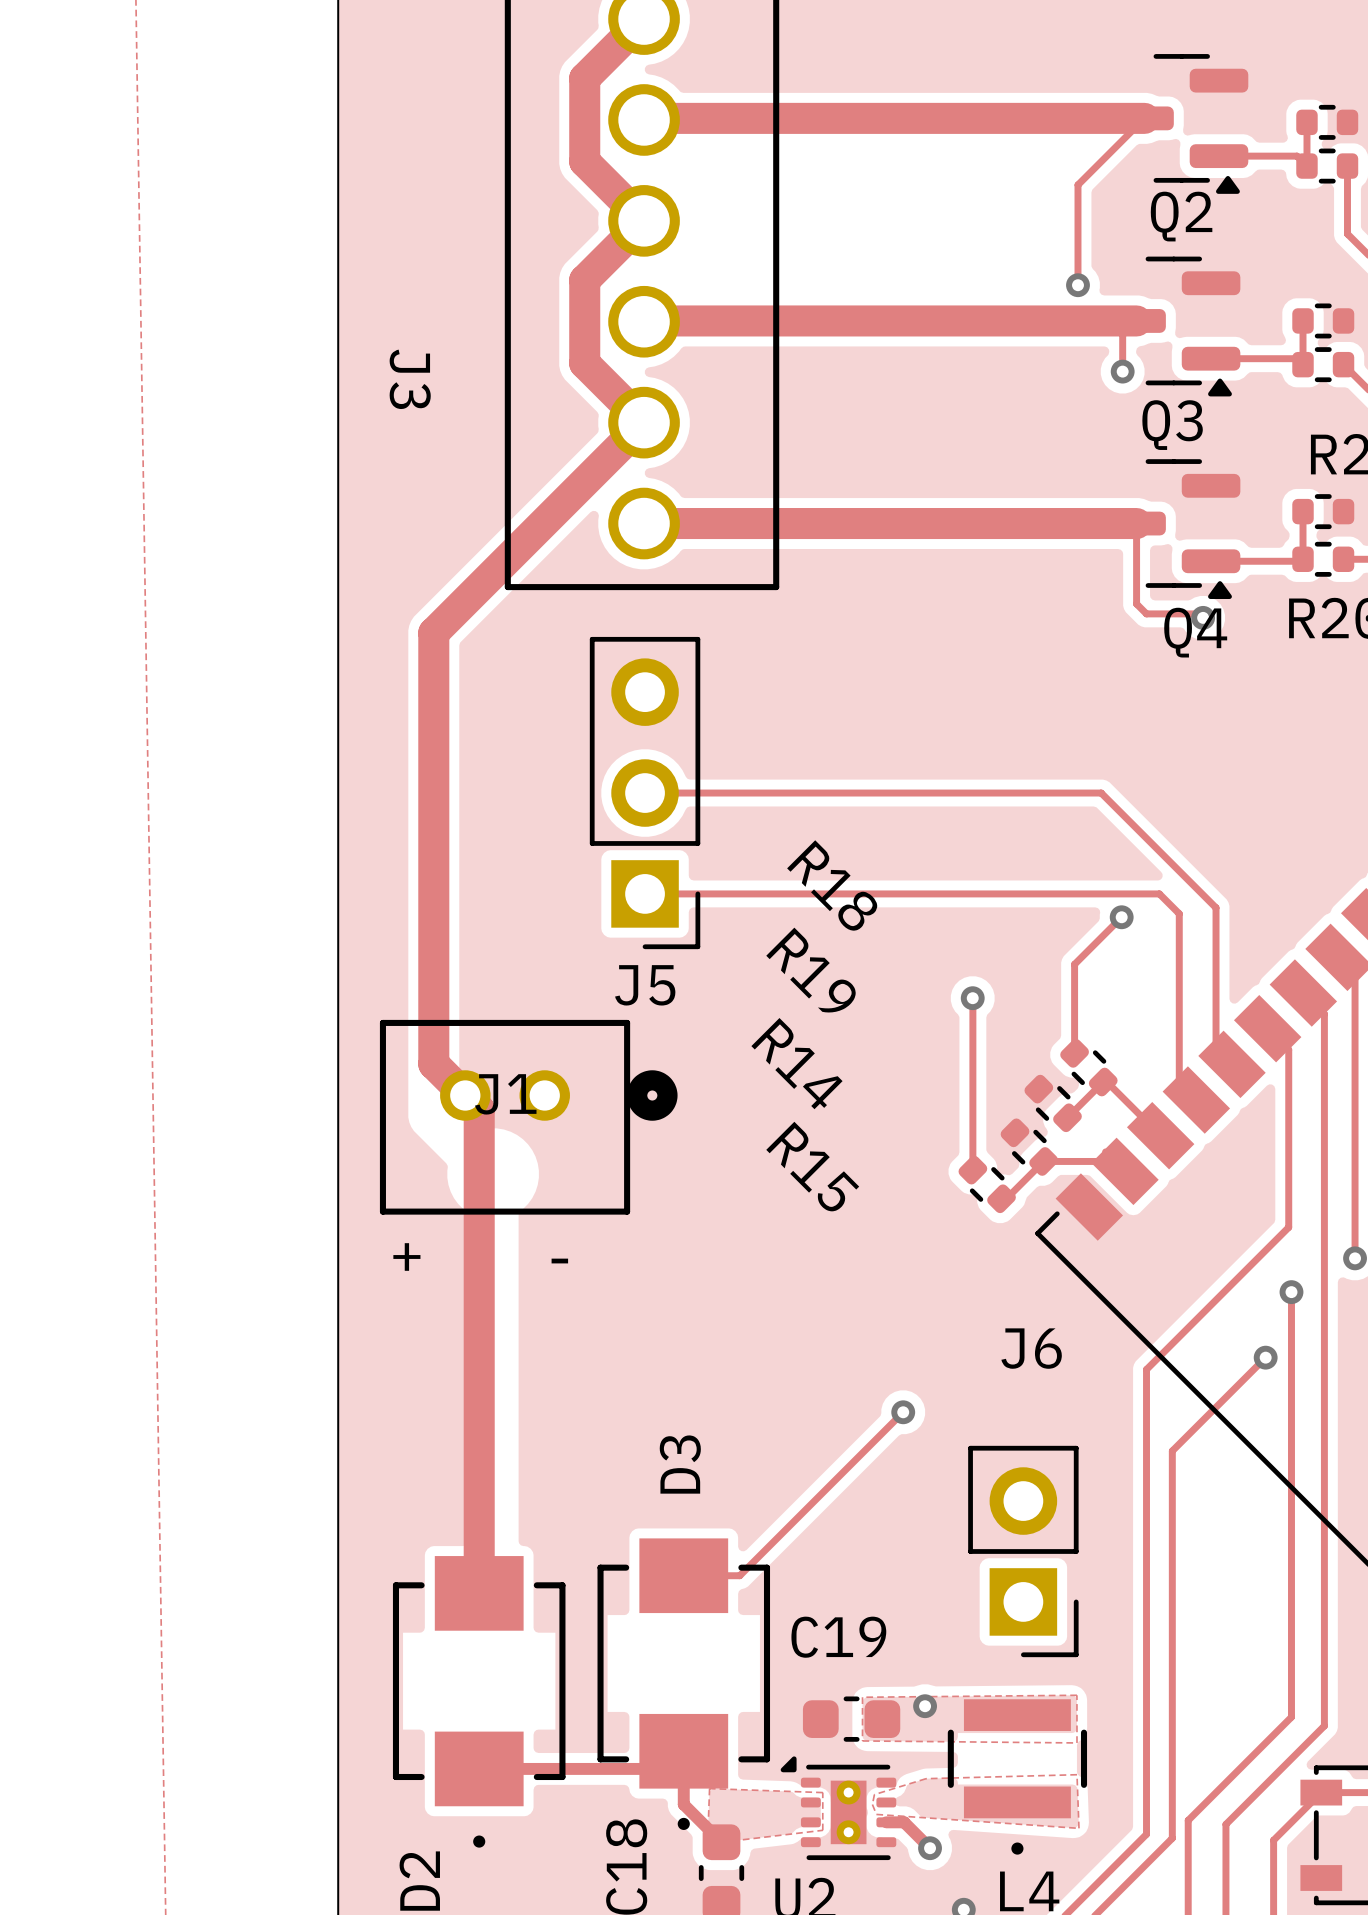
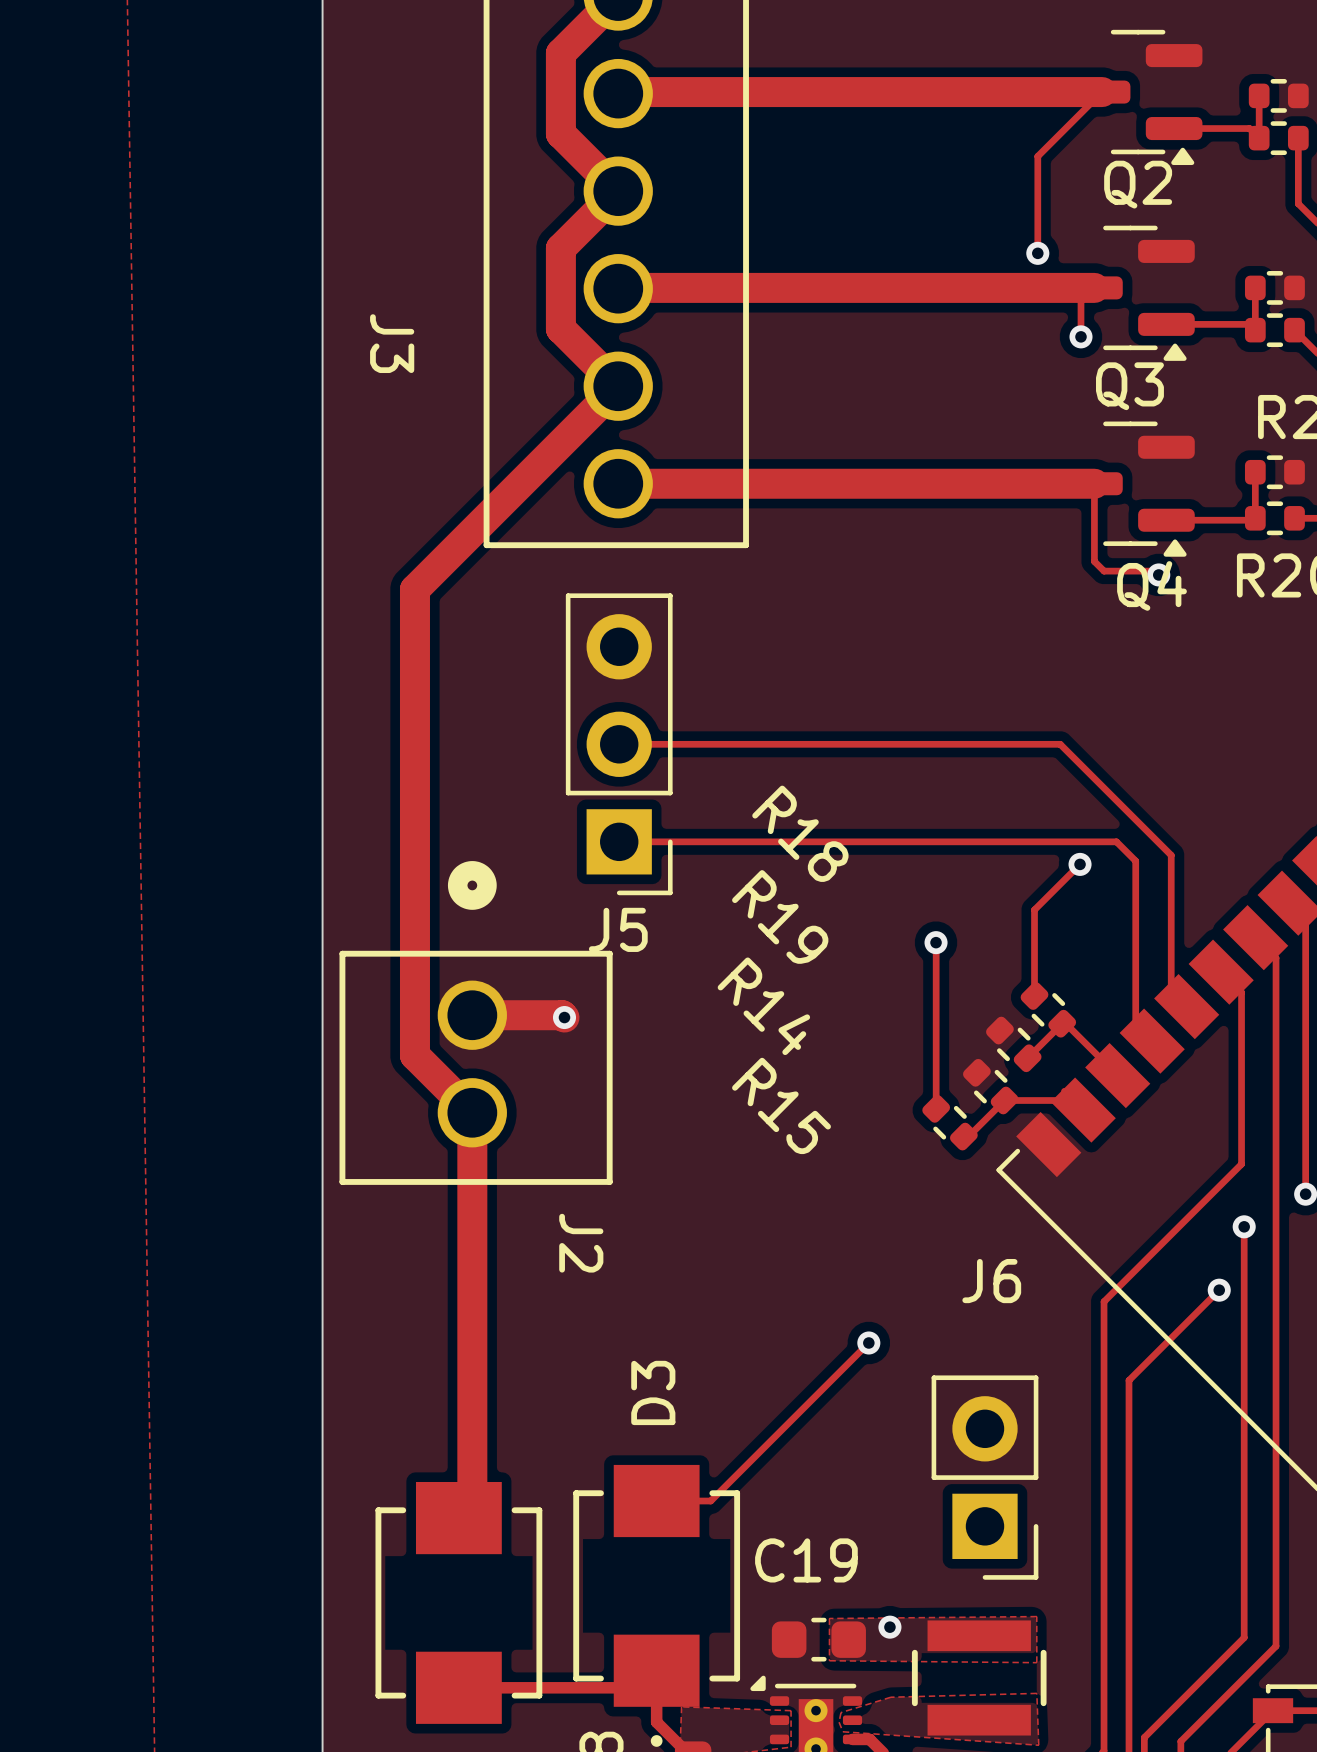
track: (433, 1063) (479, 1109) (479, 1593) -> (414, 1006) (414, 1055) (472, 1112) (472, 1504)
track: none -> (472, 1015) (562, 1015) (564, 1017)
via: none -> (564, 1017)
J2: none -> (476, 1022)
J1: (528, 1117) -> none
text: + (406, 1256) -> none
text: - (559, 1261) -> none

